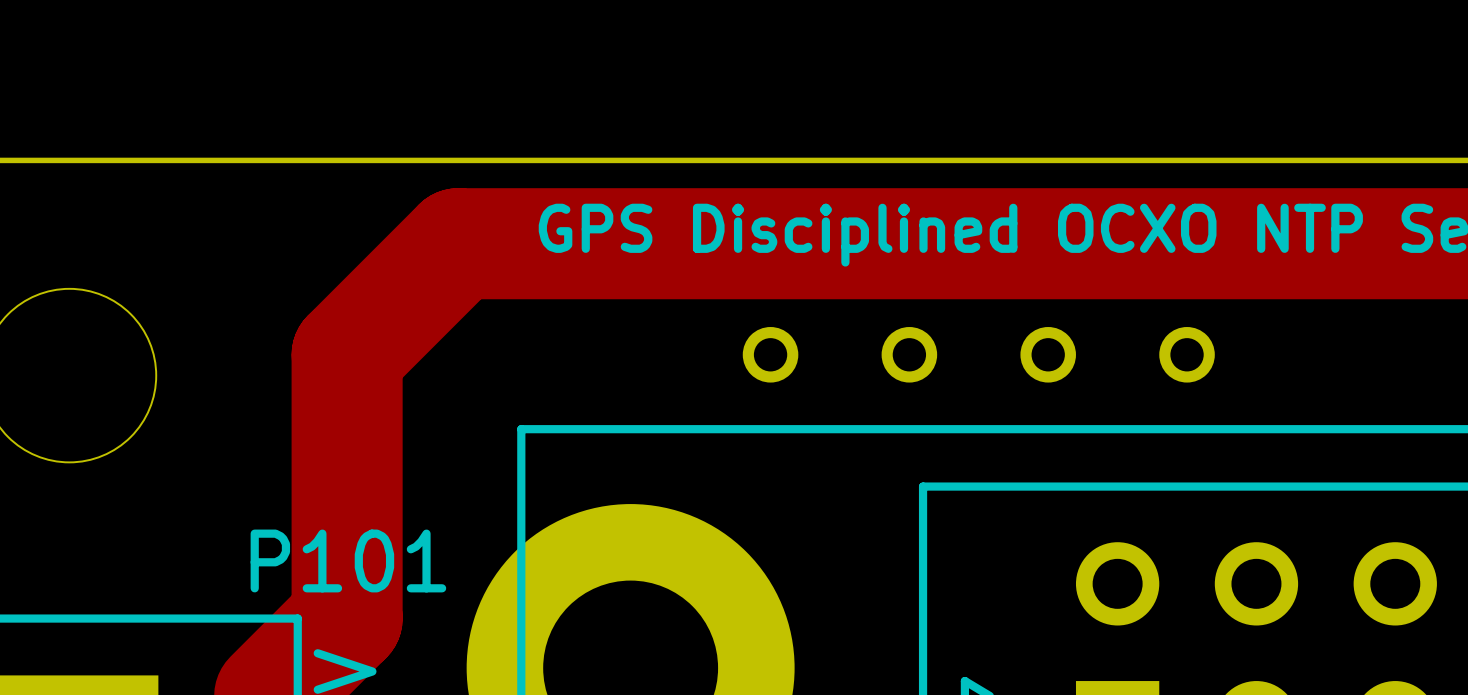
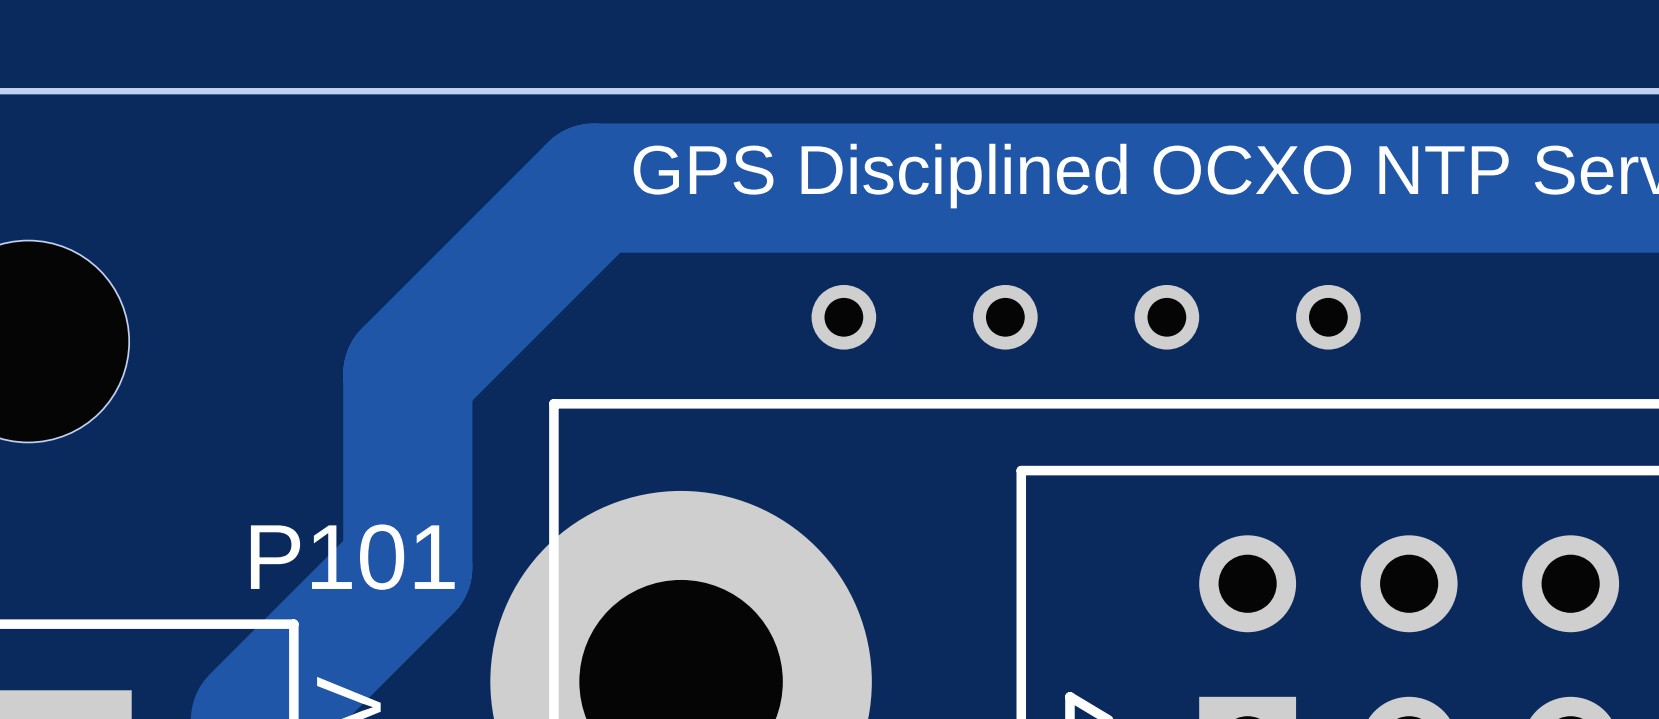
track: (555, 243) (458, 243) (347, 354) (347, 618) -> (593, 188) (407, 373) (407, 567) (351, 624)

